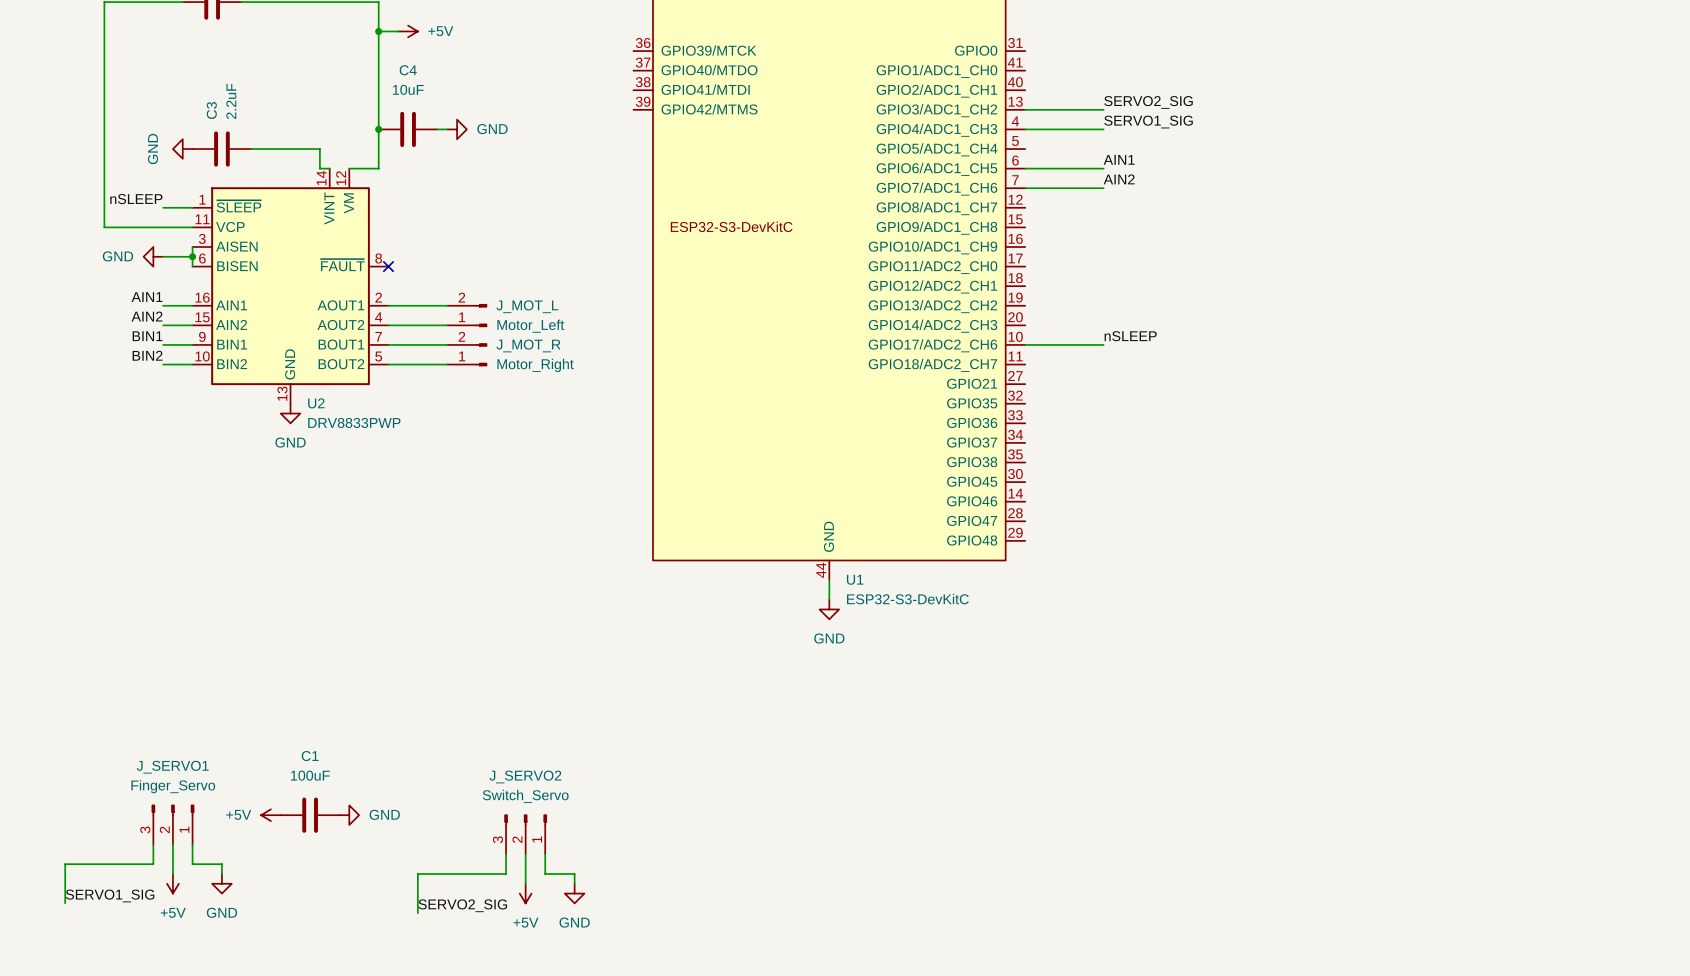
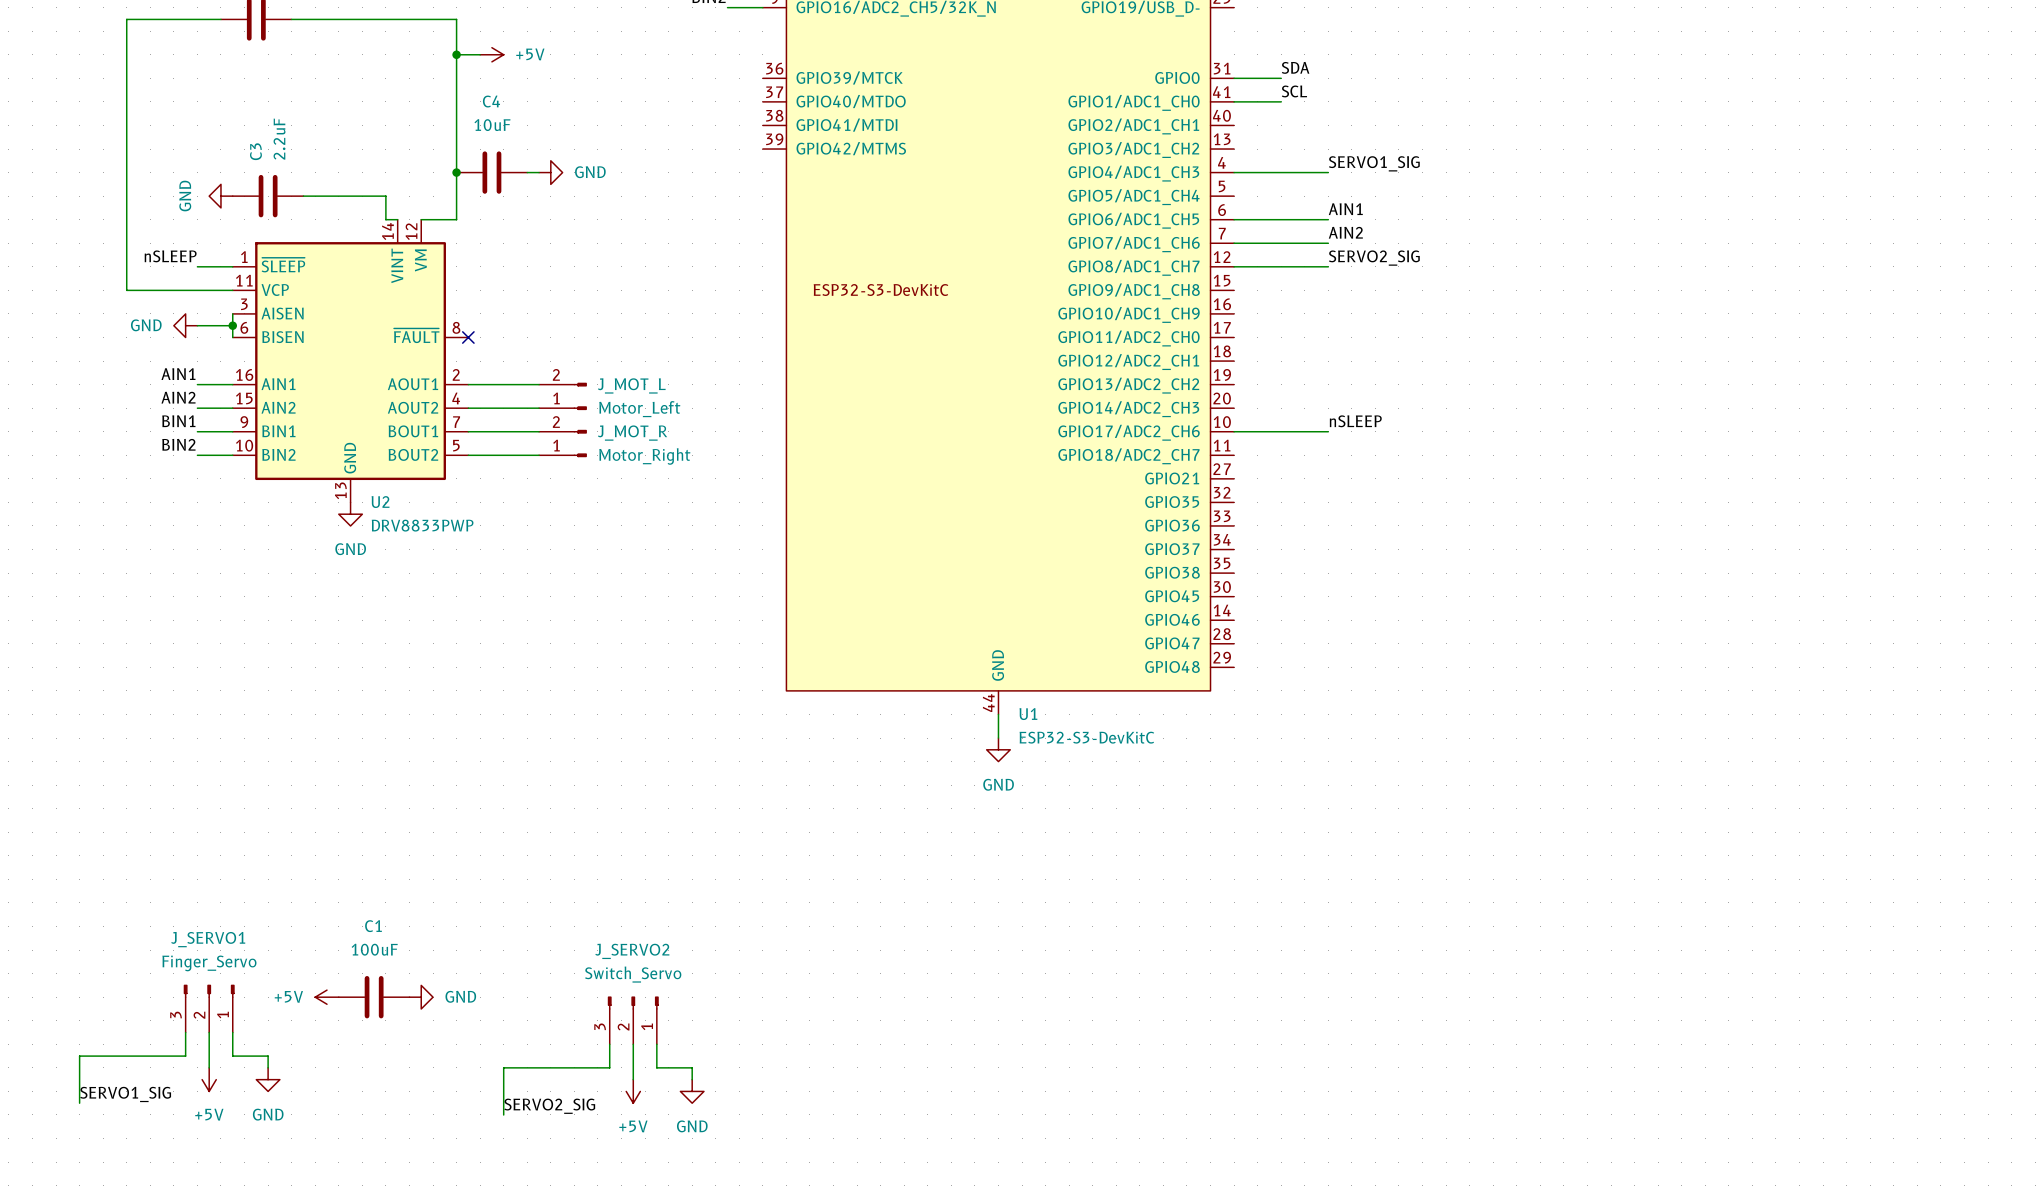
label: none -> SDA (1295, 67)
wire: none -> (1234, 78) (1281, 78)
label: none -> SCL (1294, 91)
wire: none -> (1234, 101) (1281, 101)
label position: SERVO2_SIG (1148, 102) -> SERVO2_SIG (1374, 258)
wire: (1025, 109) (1103, 109) -> (1234, 266) (1328, 266)

